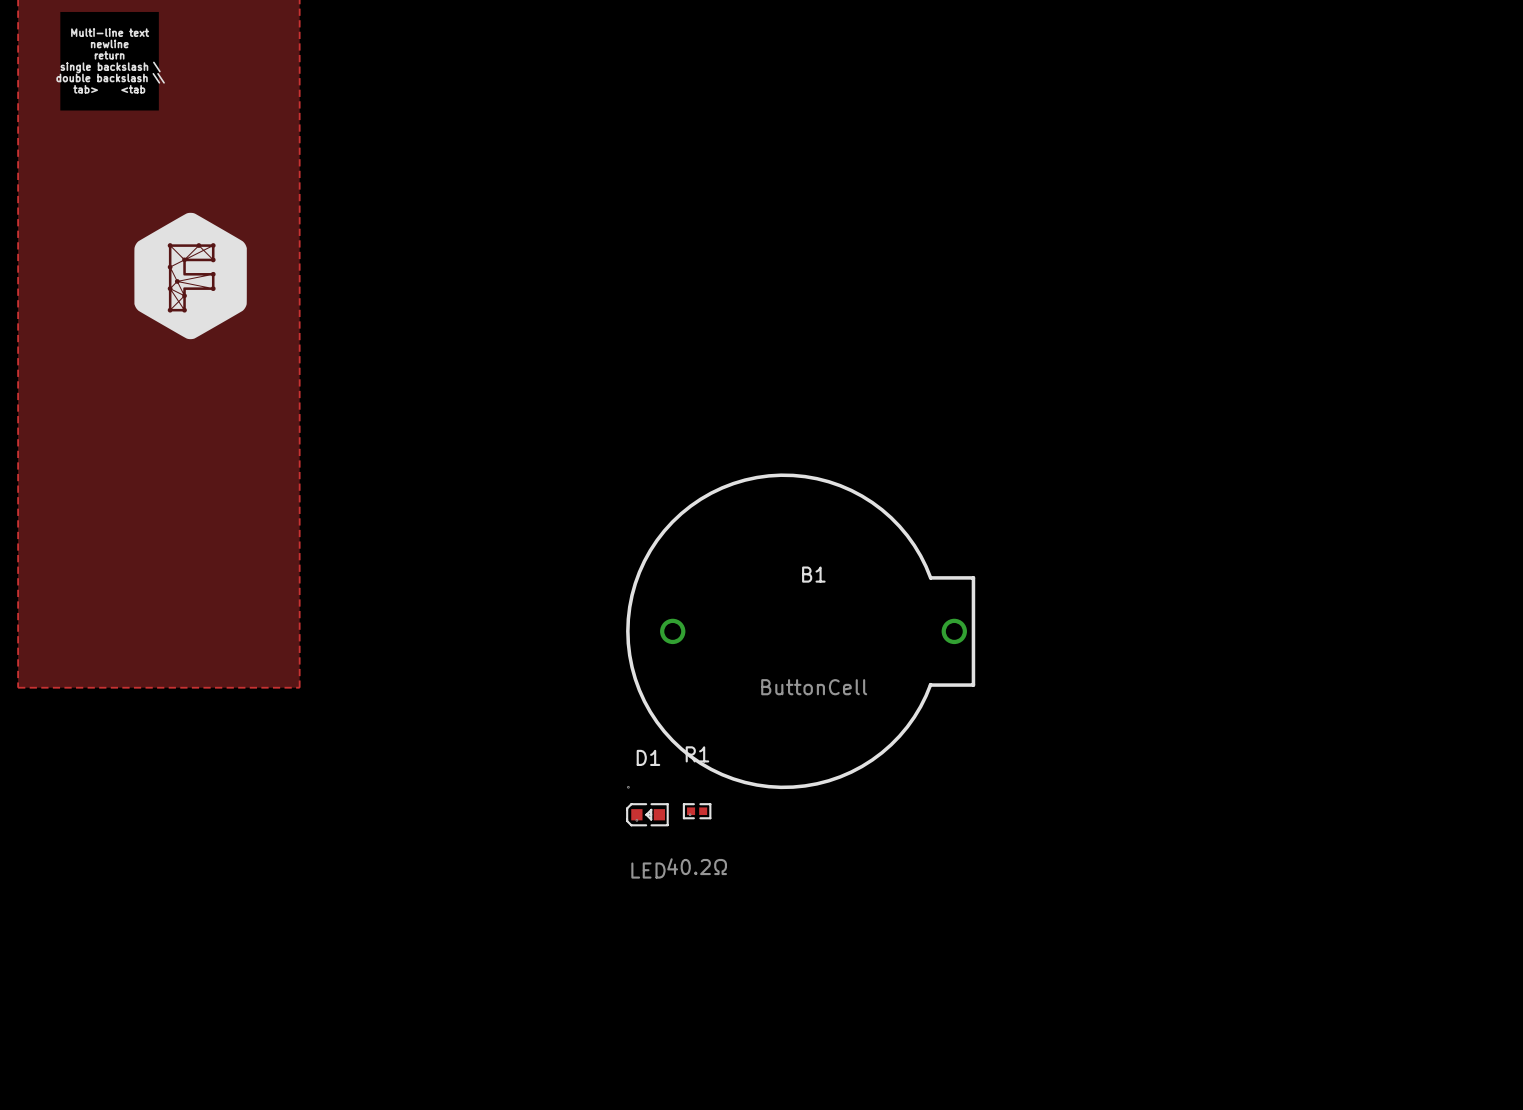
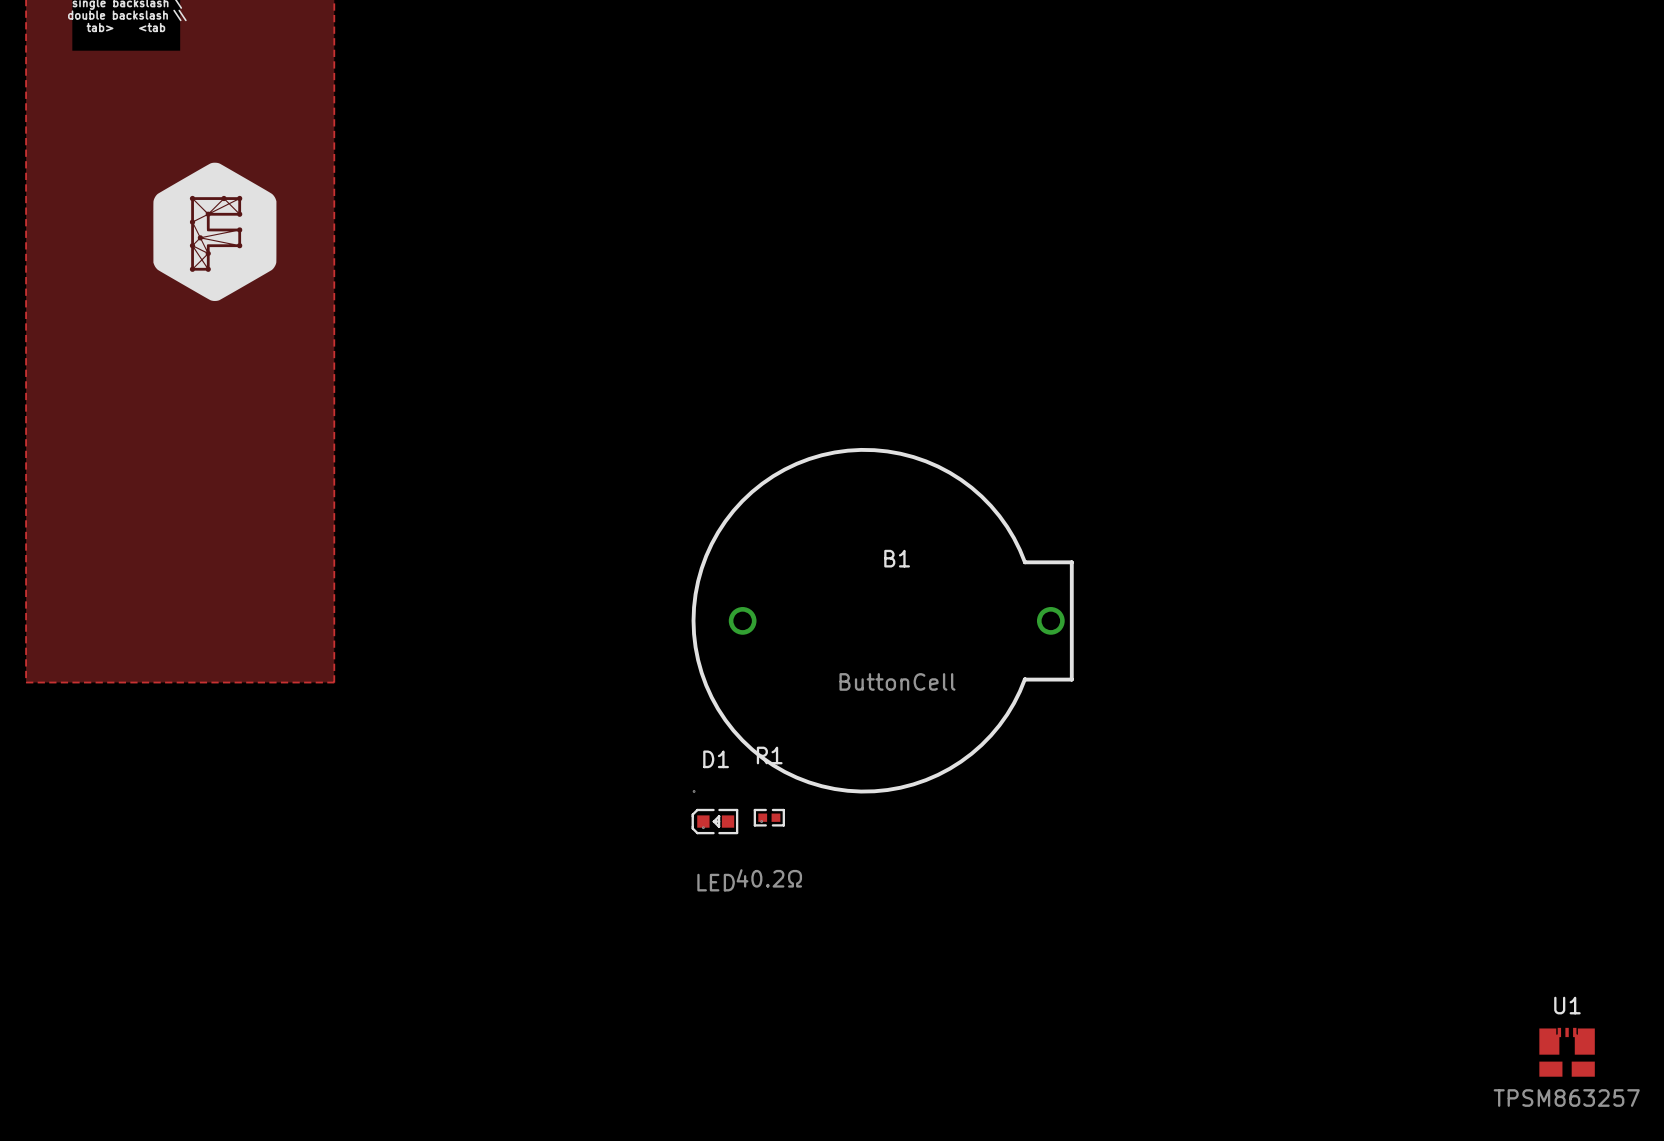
U1: none -> TPSM863257 (1567, 1052)

